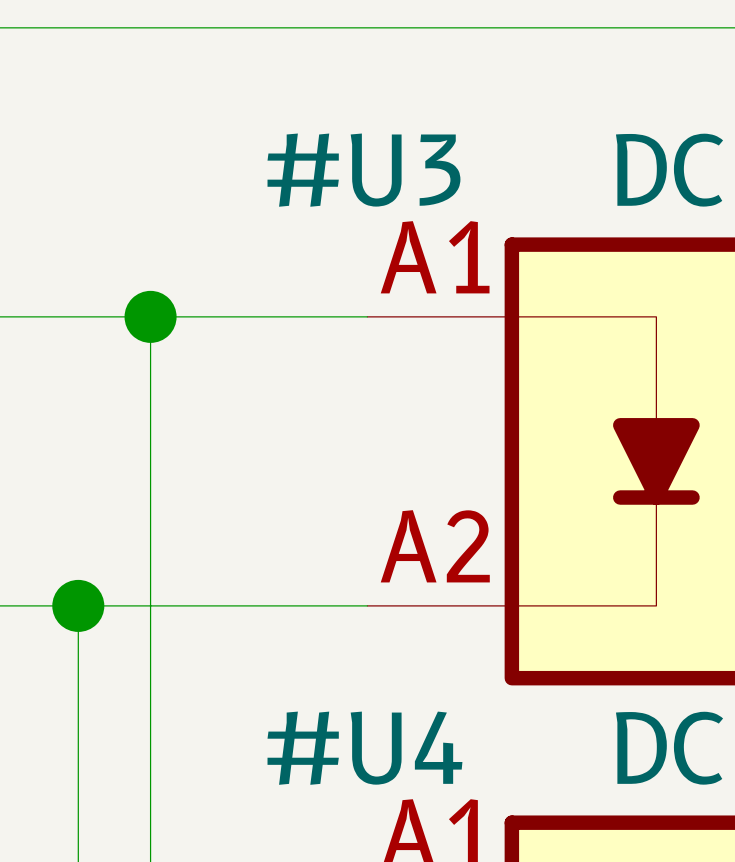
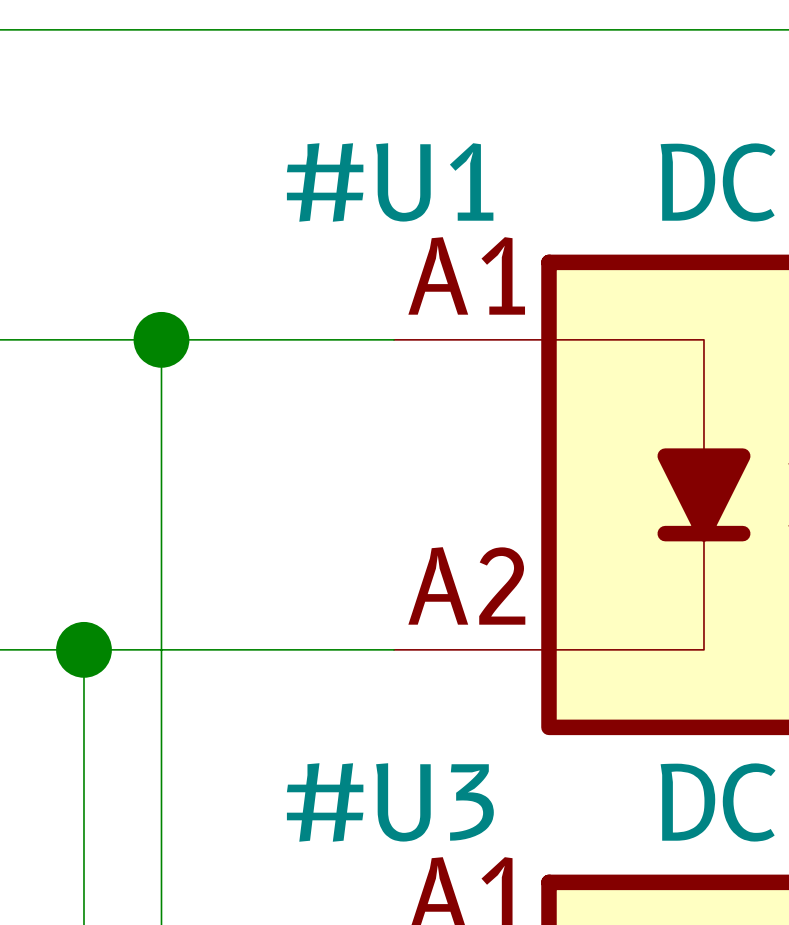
#U3 name: #U3 (363, 170) -> #U1 (390, 182)
#U4 name: #U4 (364, 748) -> #U3 (390, 802)

